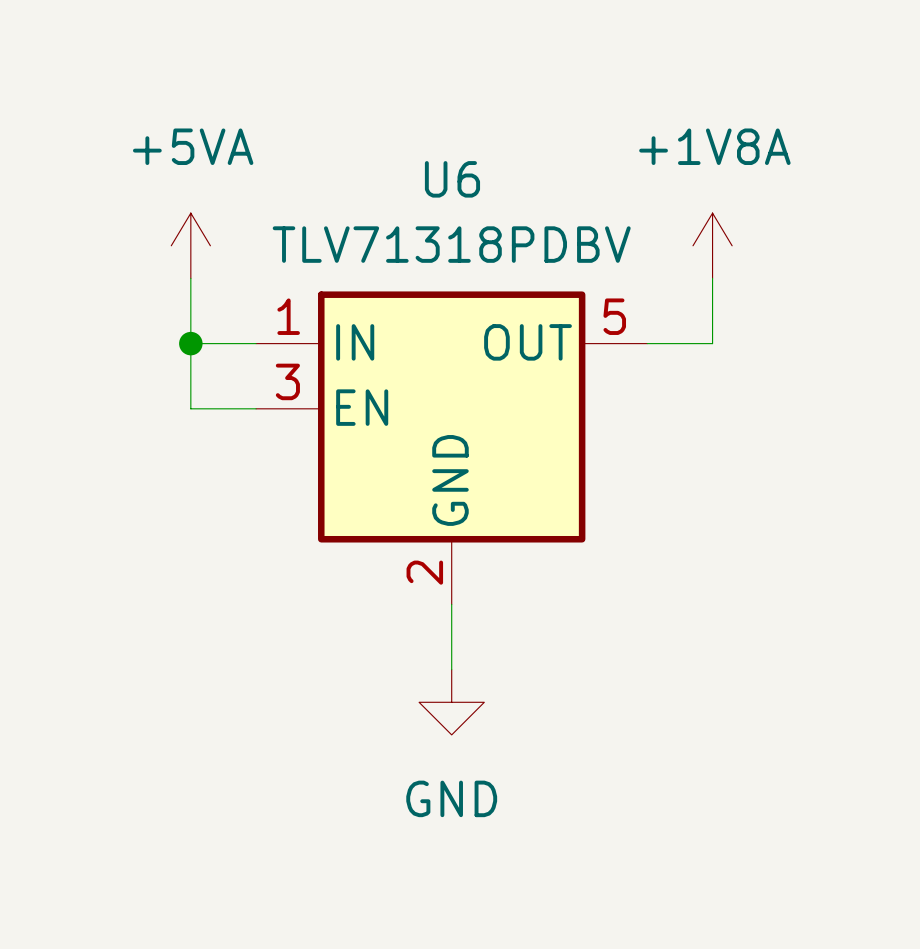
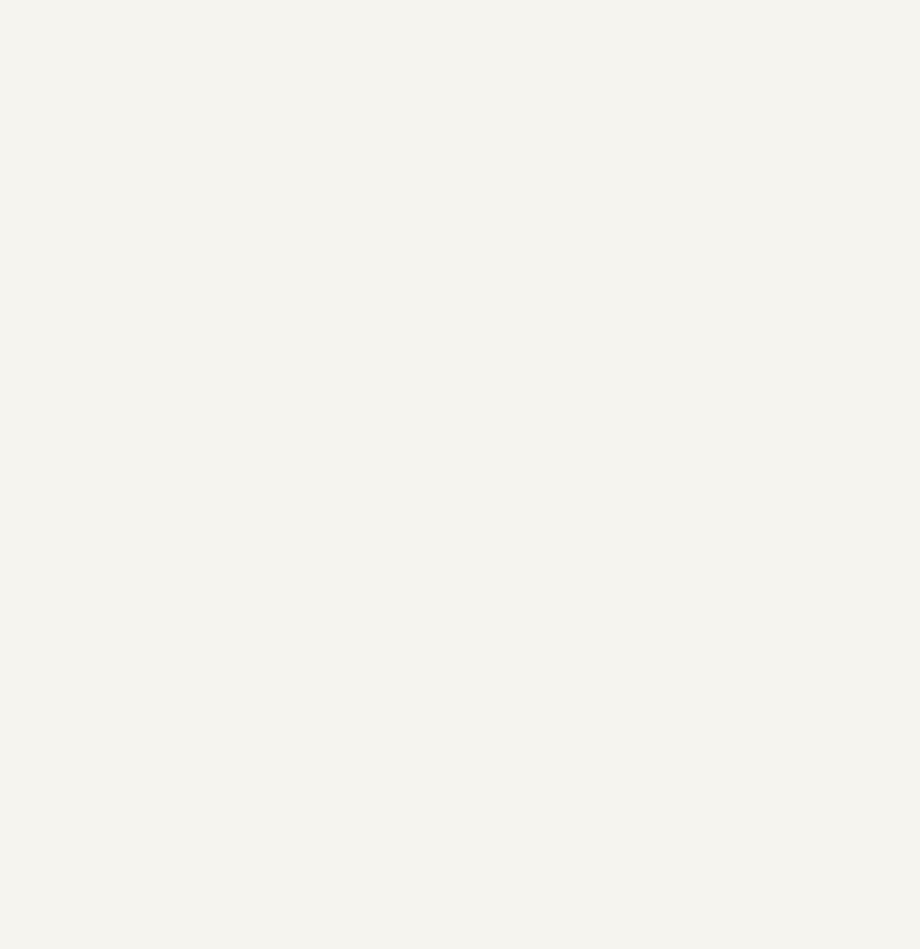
power symbol: +5VA (190, 245) -> none
power symbol: +1V8A (712, 245) -> none
wire: (190, 278) (190, 408) (256, 408) -> none
wire: (712, 278) (712, 343) (647, 343) -> none
wire: (190, 343) (256, 343) -> none
junction: (190, 343) -> none
U6: TLV71318PDBV (451, 447) -> none
wire: (451, 604) (451, 669) -> none
power symbol: GND (451, 702) -> none

